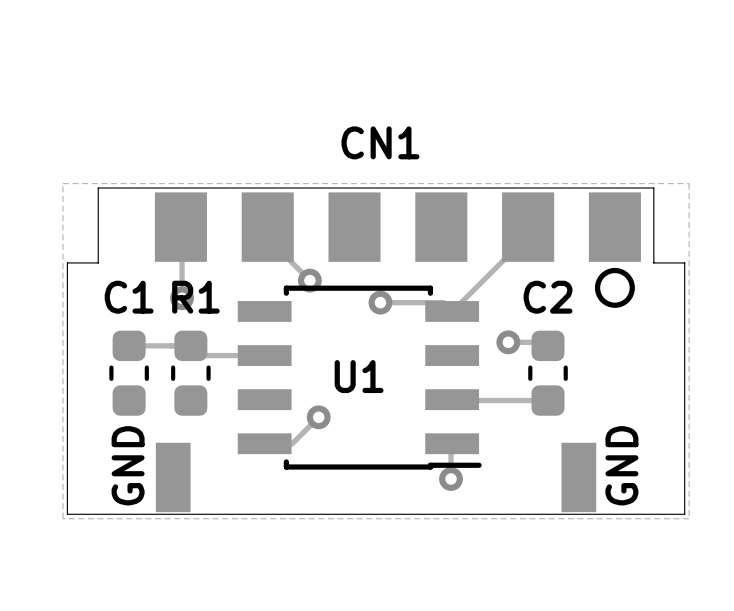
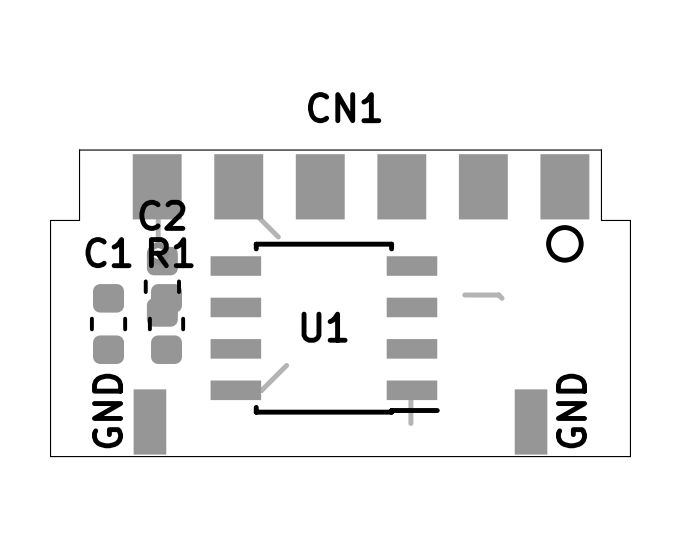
zone outline: (62, 183) (62, 518) (689, 518) (689, 183) (62, 183) -> none
track: (528, 227) (528, 235) (452, 311) -> none
via: (309, 280) -> none
track: (380, 302) (443, 302) (452, 311) -> none
via: (380, 302) -> none
via: (508, 342) -> none
track: (129, 345) (190, 345) (200, 355) (264, 355) -> none
C2 position: (548, 373) -> (162, 286)
track: (452, 399) (548, 400) -> none
via: (318, 417) -> none
via: (451, 479) -> none

